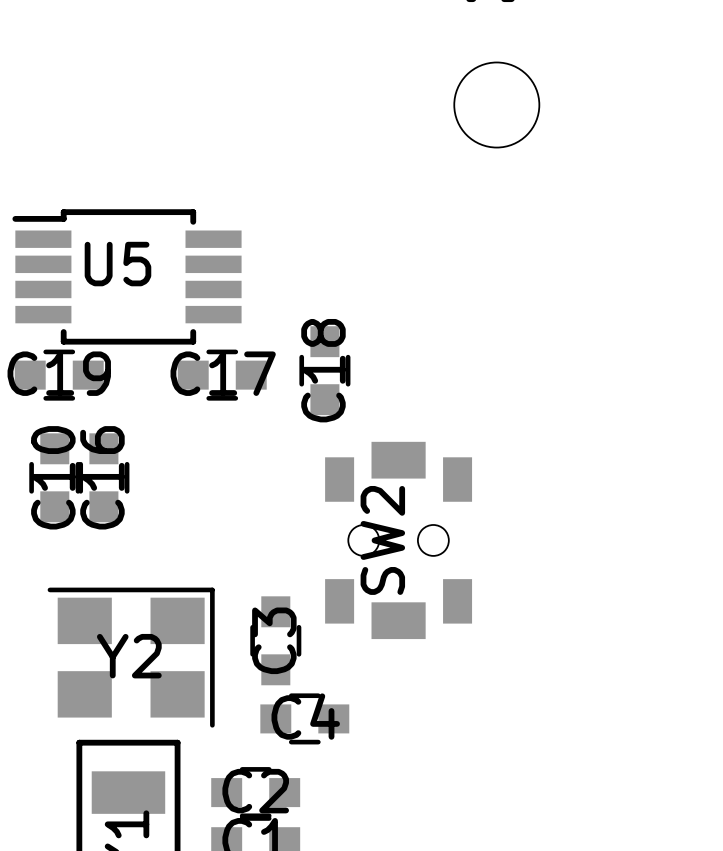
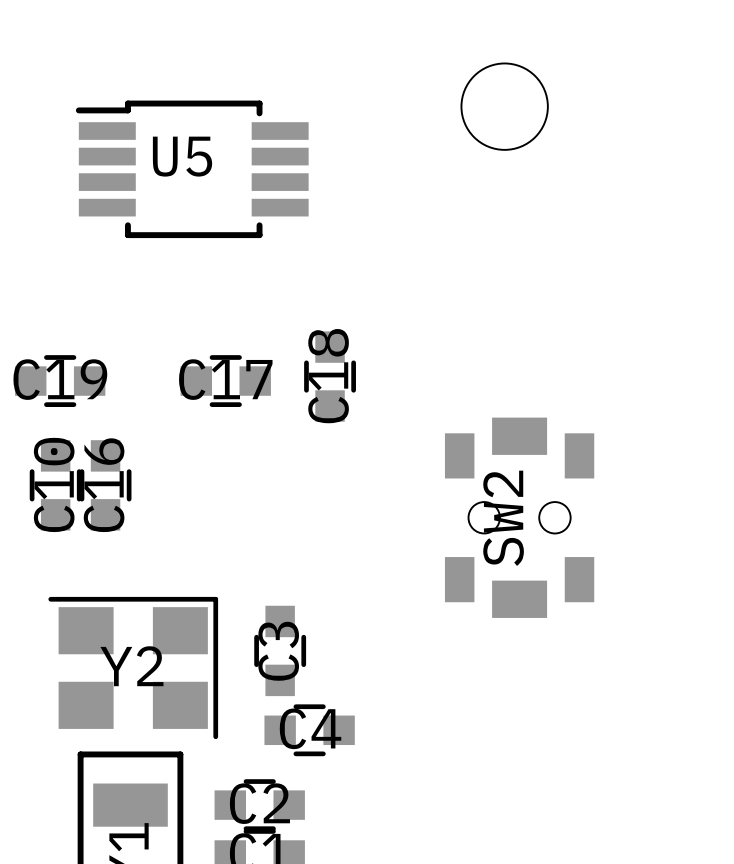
U5 position: (127, 276) -> (192, 169)
SW2 position: (398, 540) -> (519, 517)

